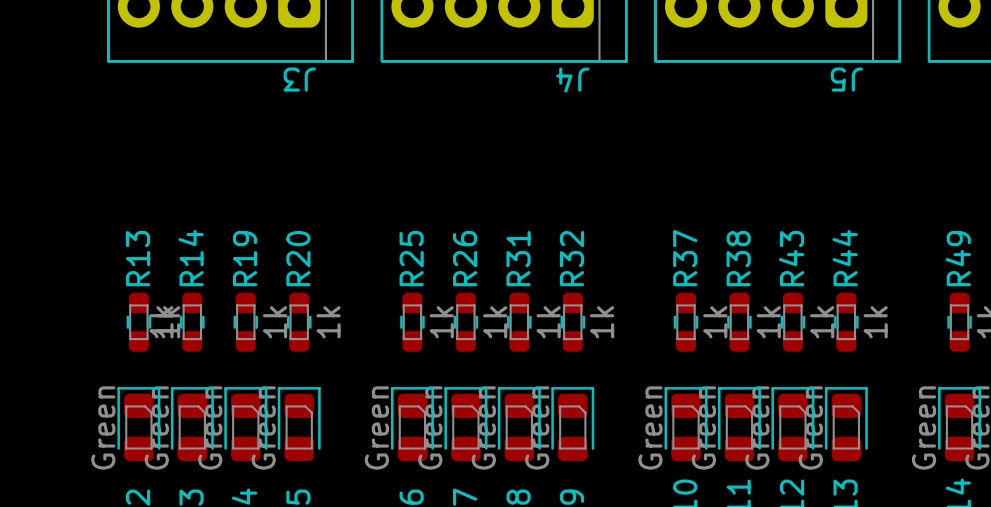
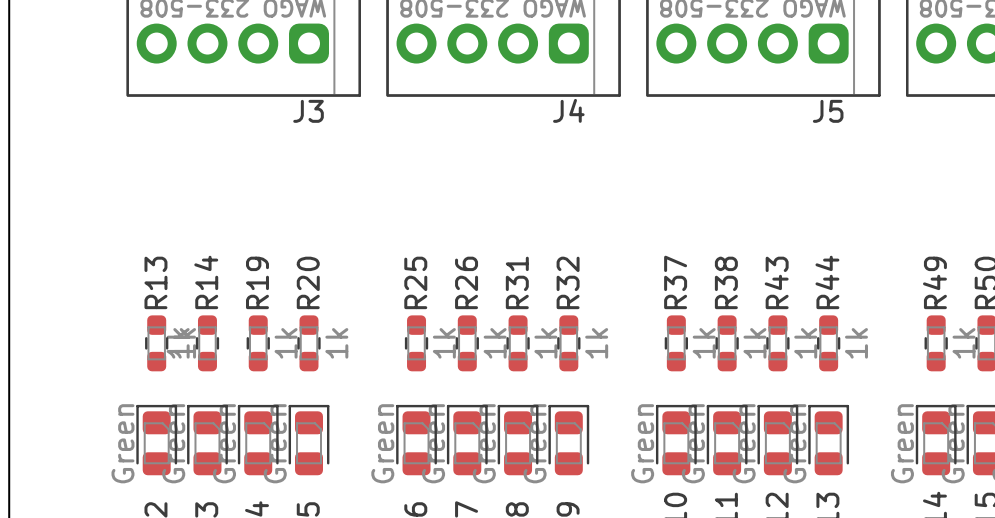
J3 name rotation: 0° (299, 79) -> 180° (308, 111)
J5 name rotation: 0° (846, 79) -> 180° (828, 111)
J4 name rotation: 0° (572, 80) -> 180° (568, 110)

